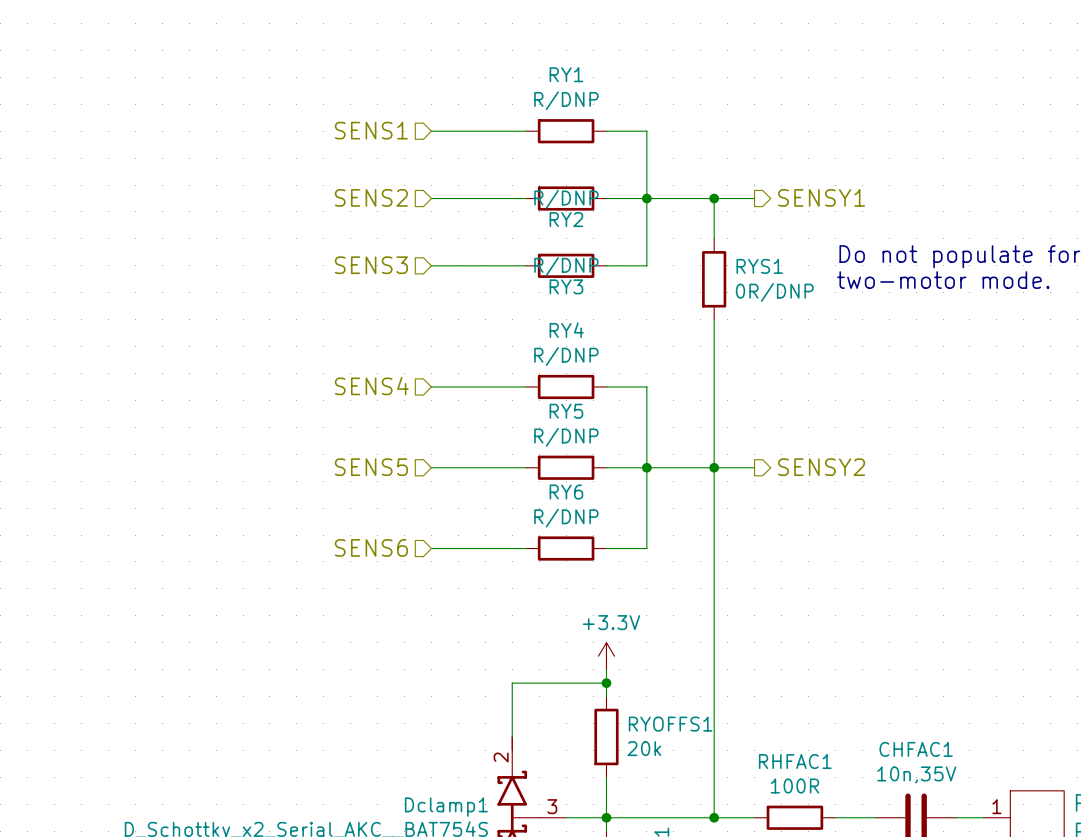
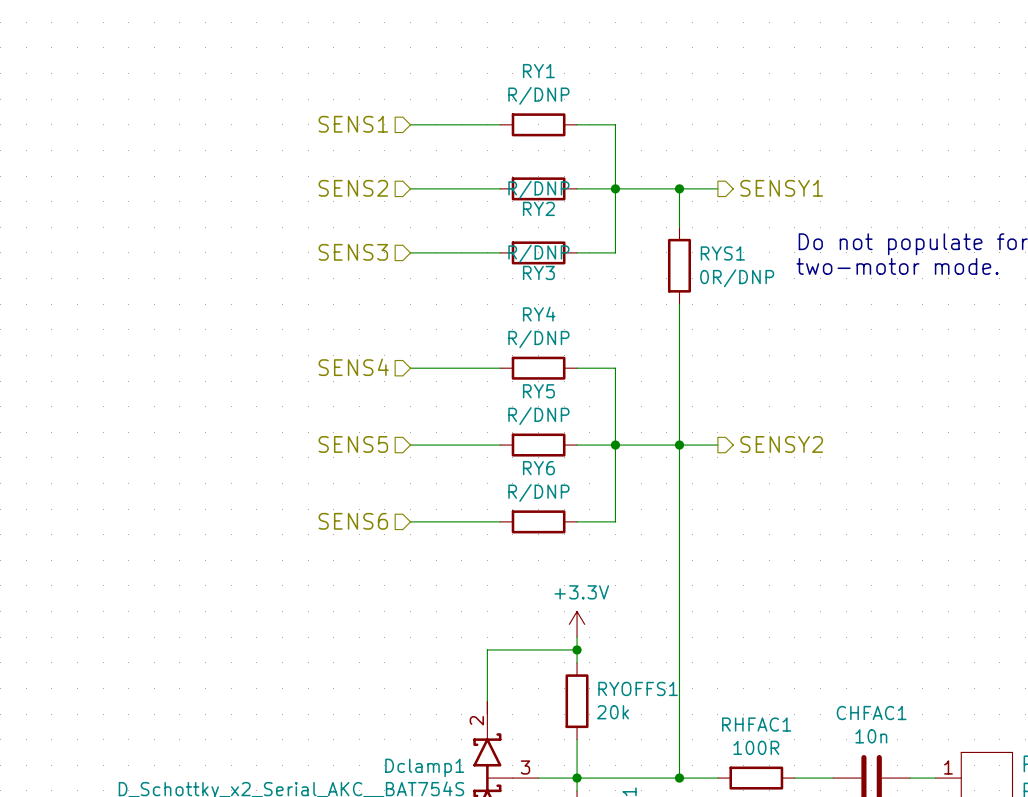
CHFAC1 value: 10n,35V (916, 774) -> 10n (871, 736)

